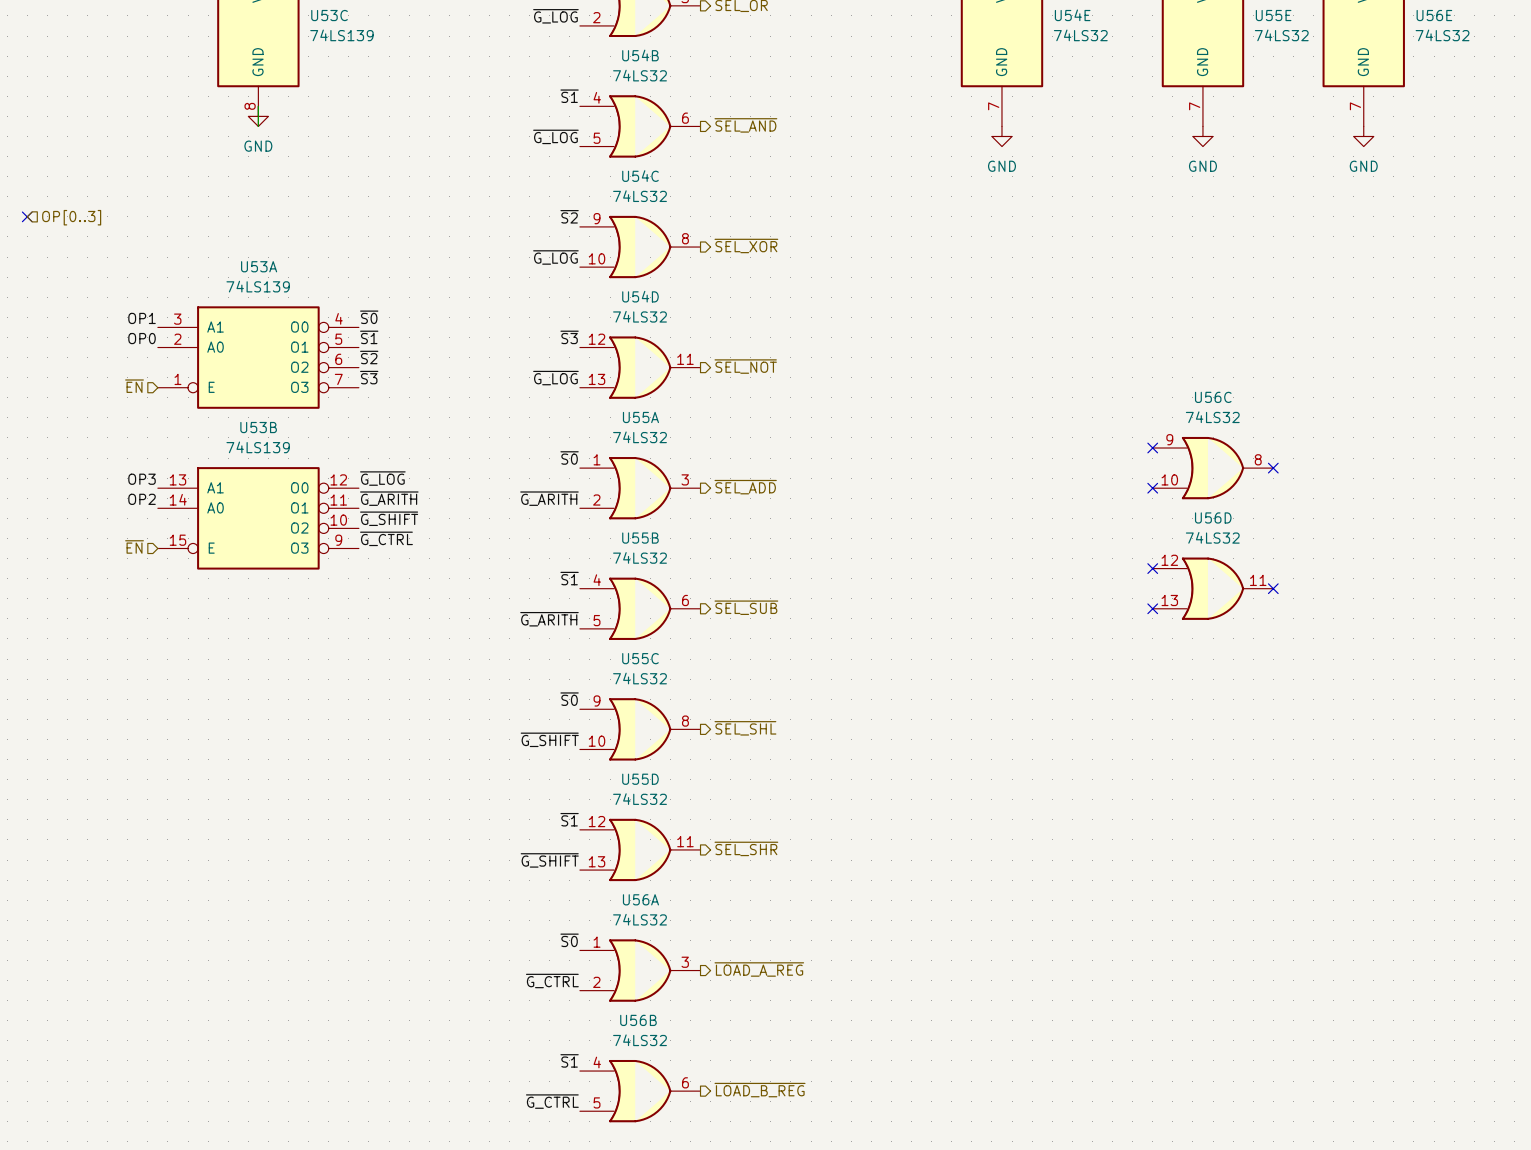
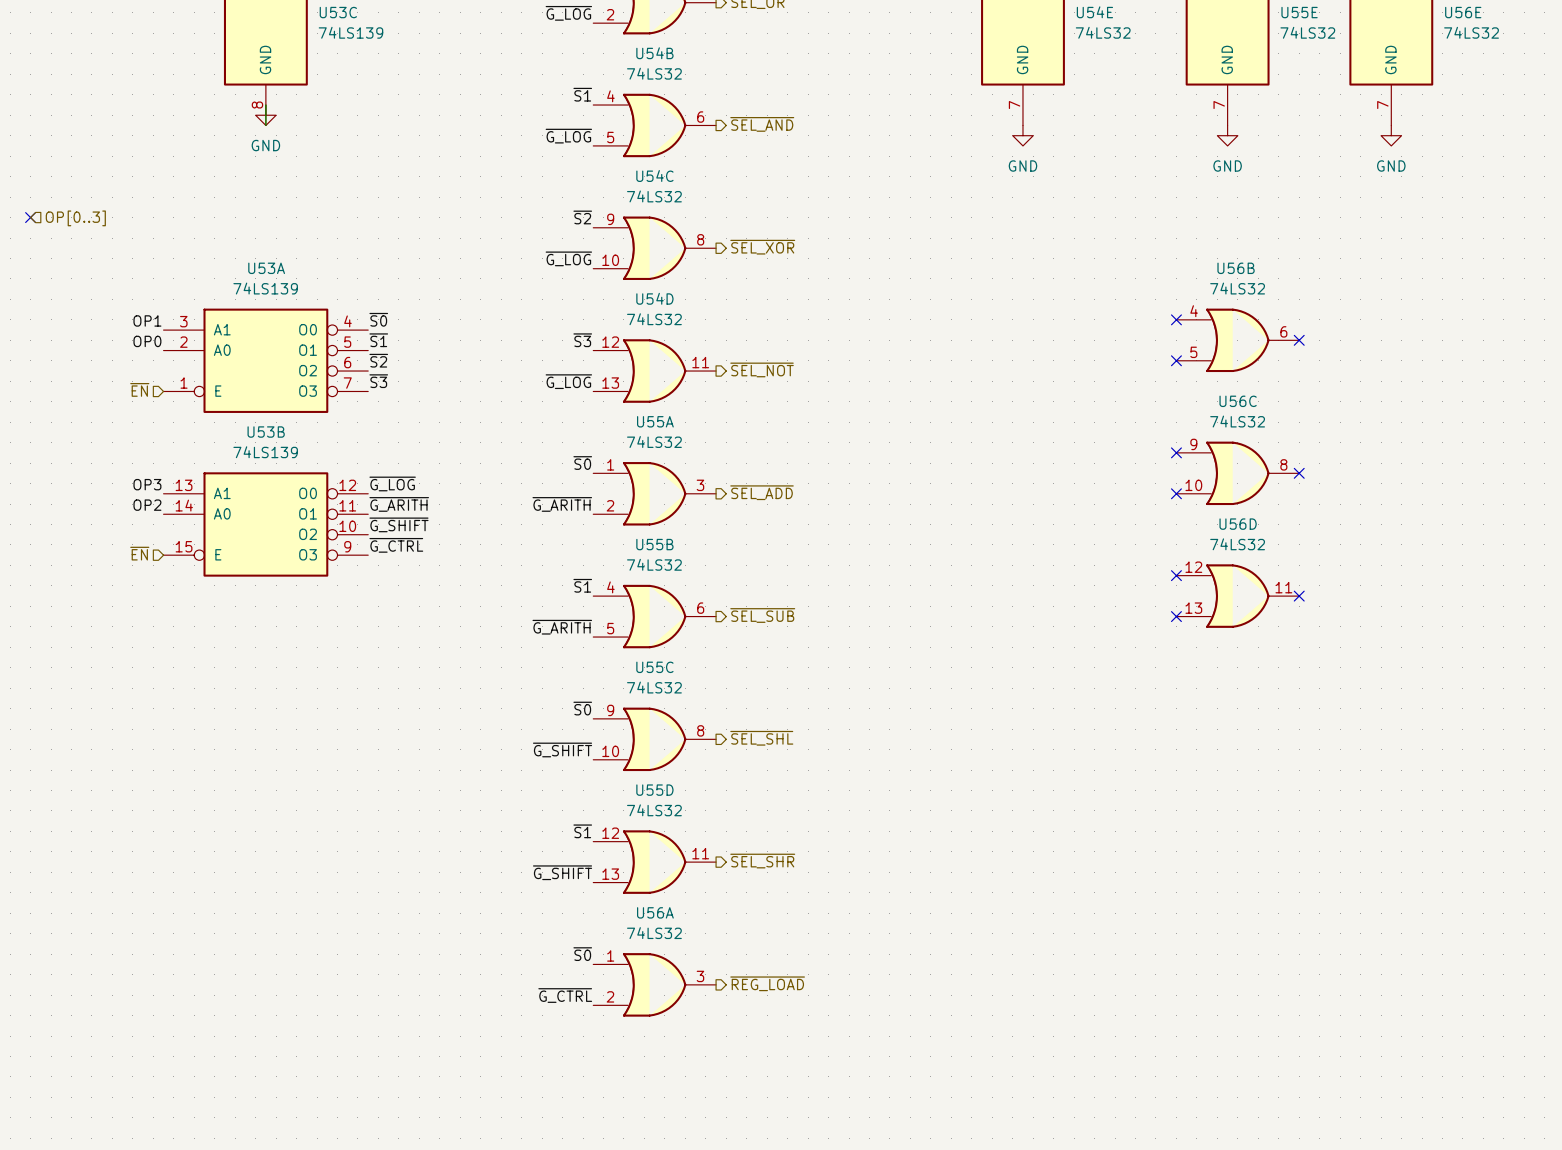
no-connect mark: none -> (1176, 319)
no-connect mark: none -> (1299, 340)
no-connect mark: none -> (1176, 360)
hierarchical label: ~{LOAD_A_REG} (759, 969) -> ~{REG_LOAD} (767, 983)
label: ~{S1} (569, 1060) -> none
hierarchical label: ~{LOAD_B_REG} (760, 1090) -> none
U56B position: (640, 1091) -> (1237, 340)
label: ~{G_CTRL} (552, 1101) -> none

